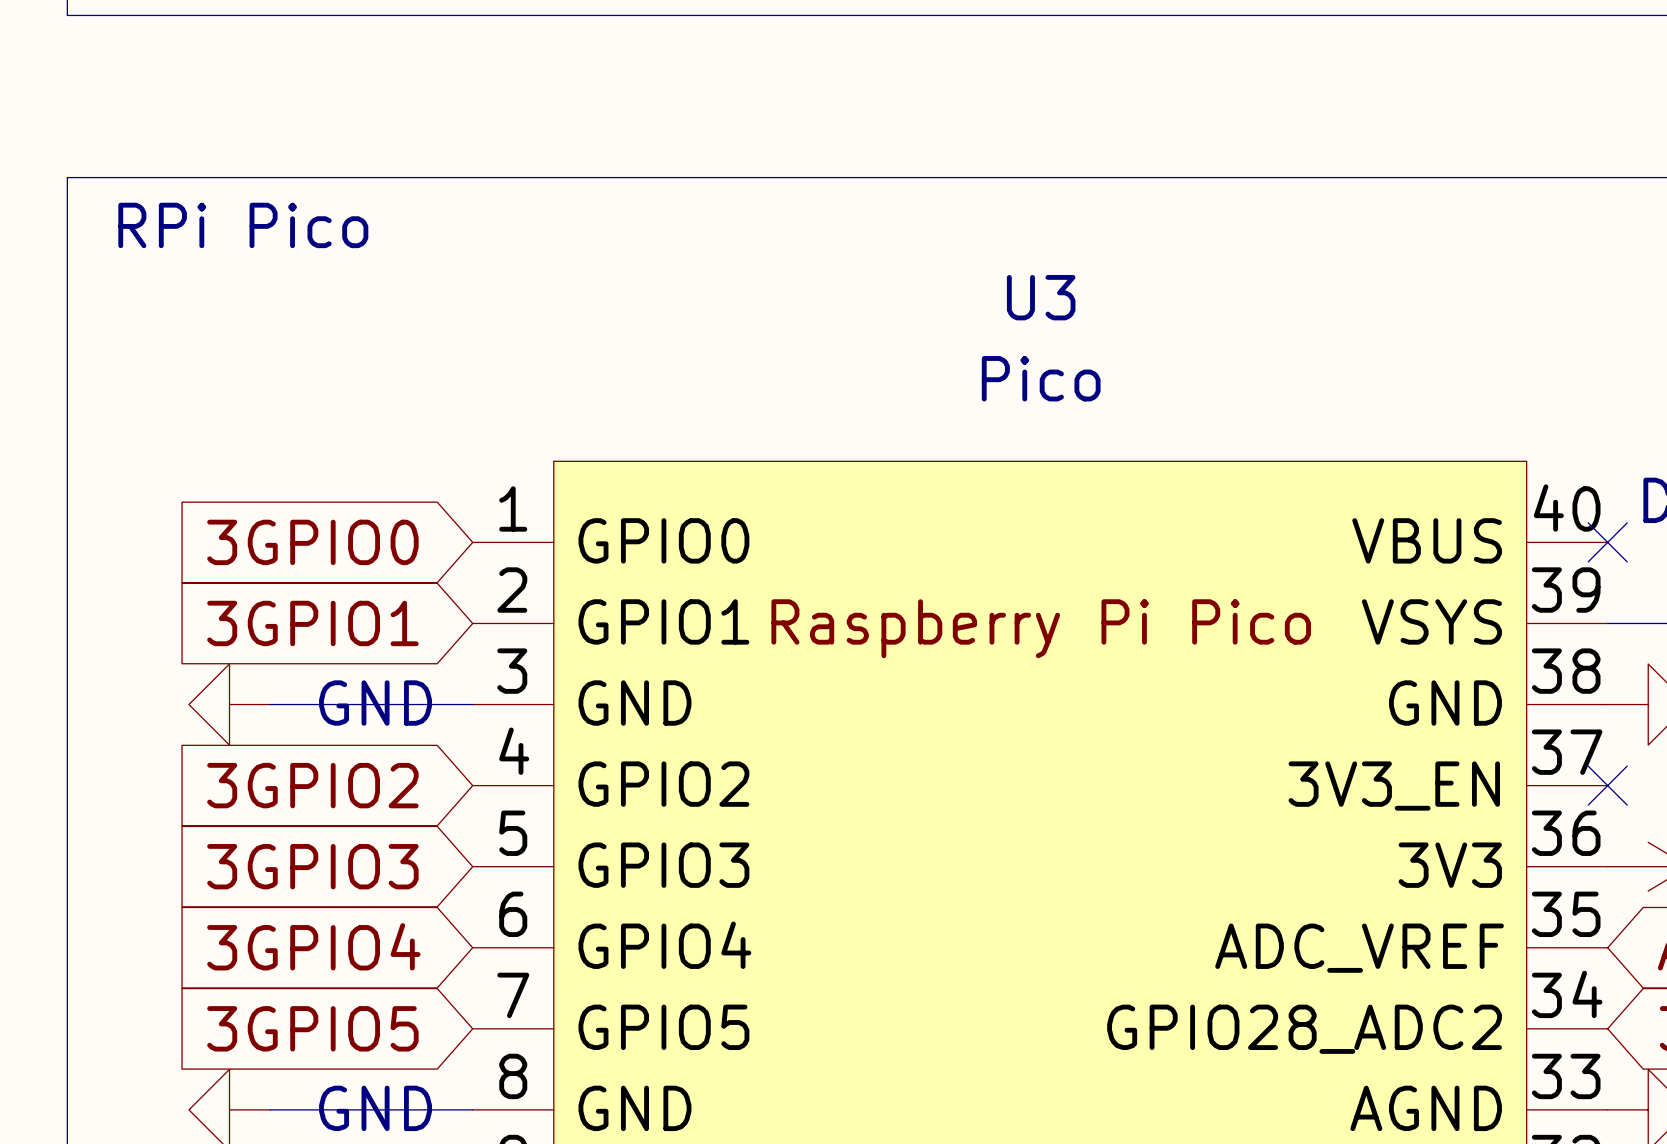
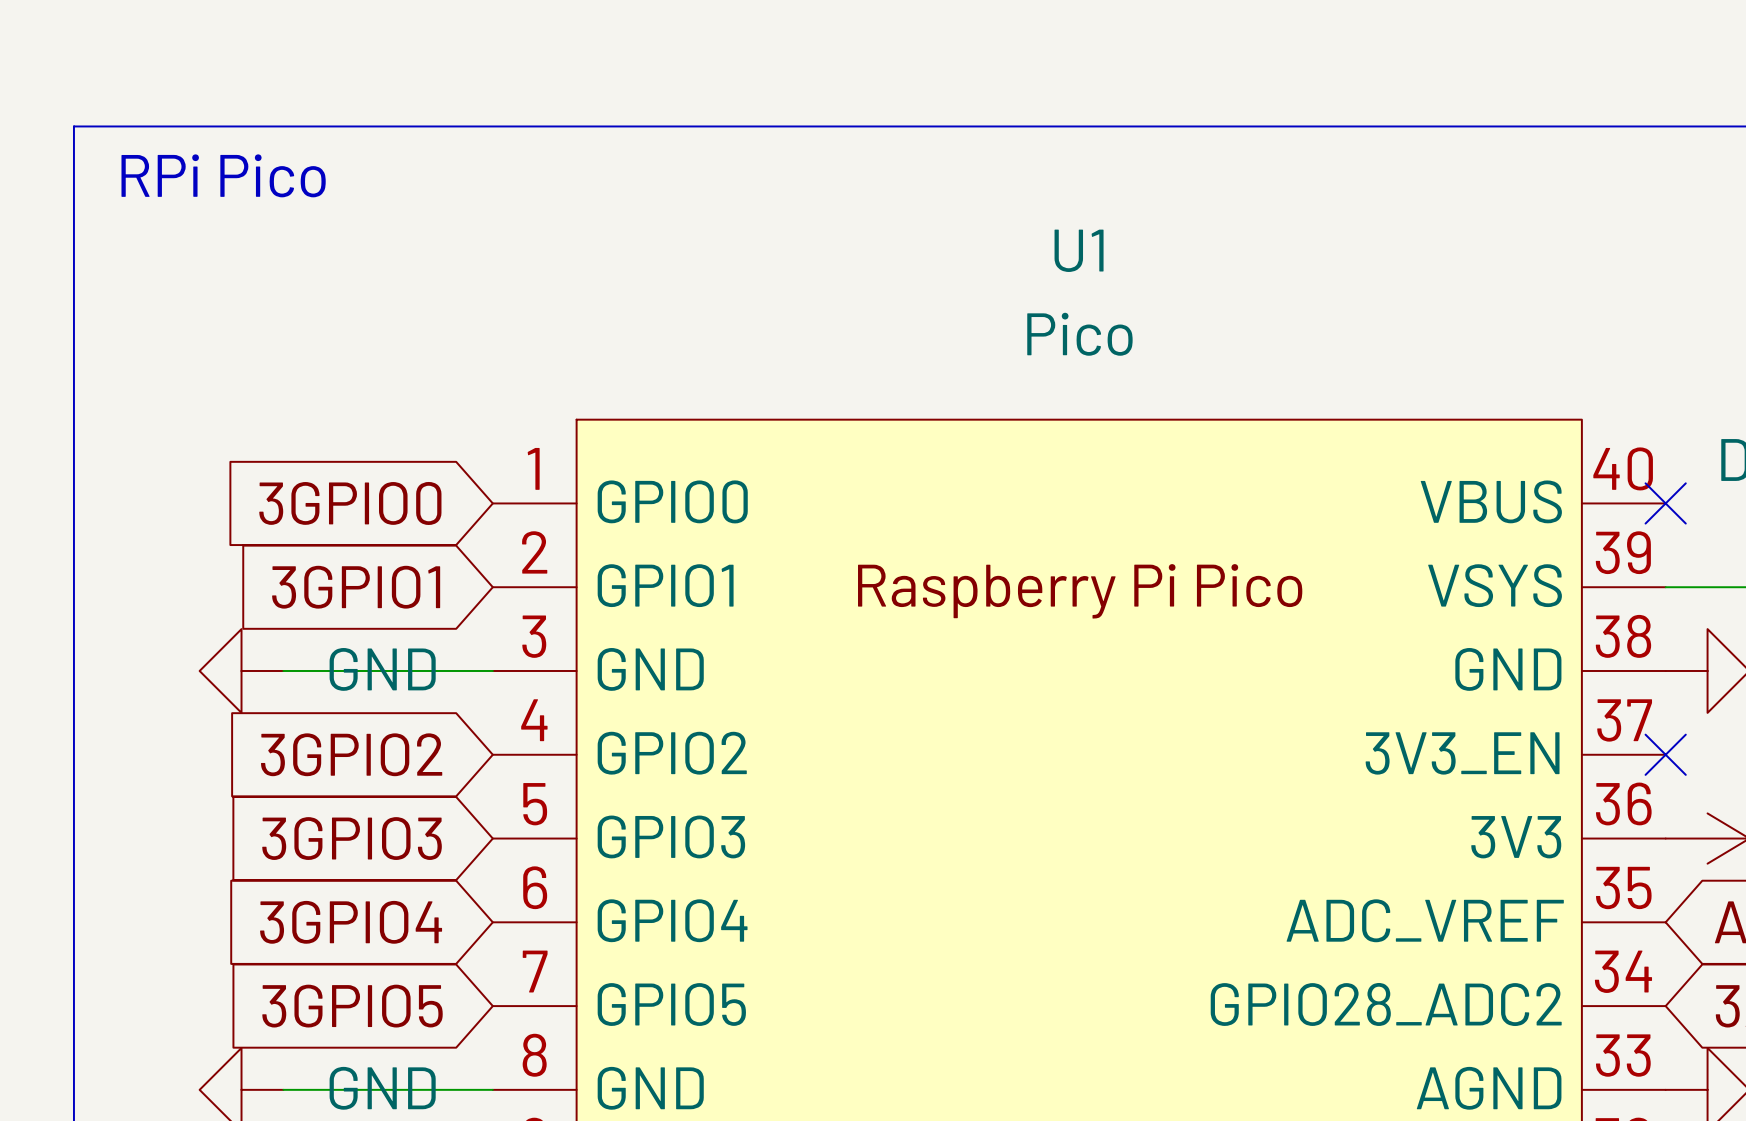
U3 name: U3 (1041, 297) -> U1 (1079, 250)

